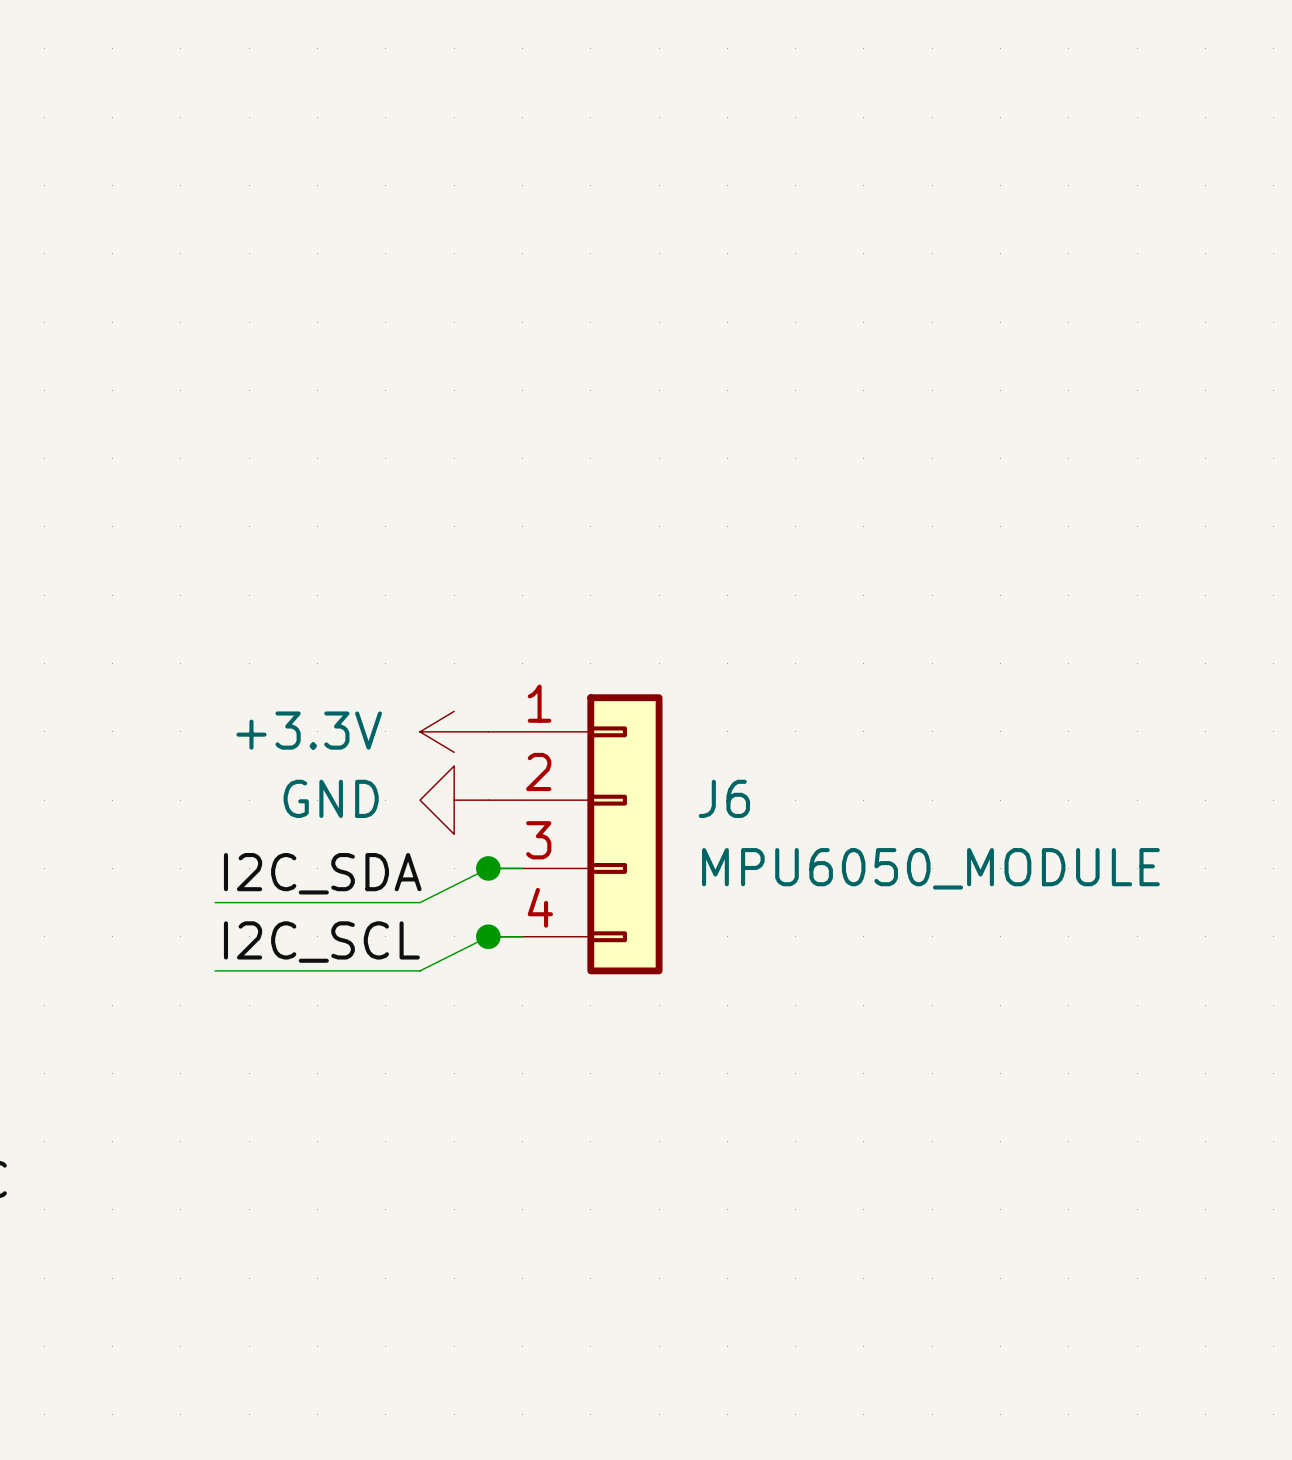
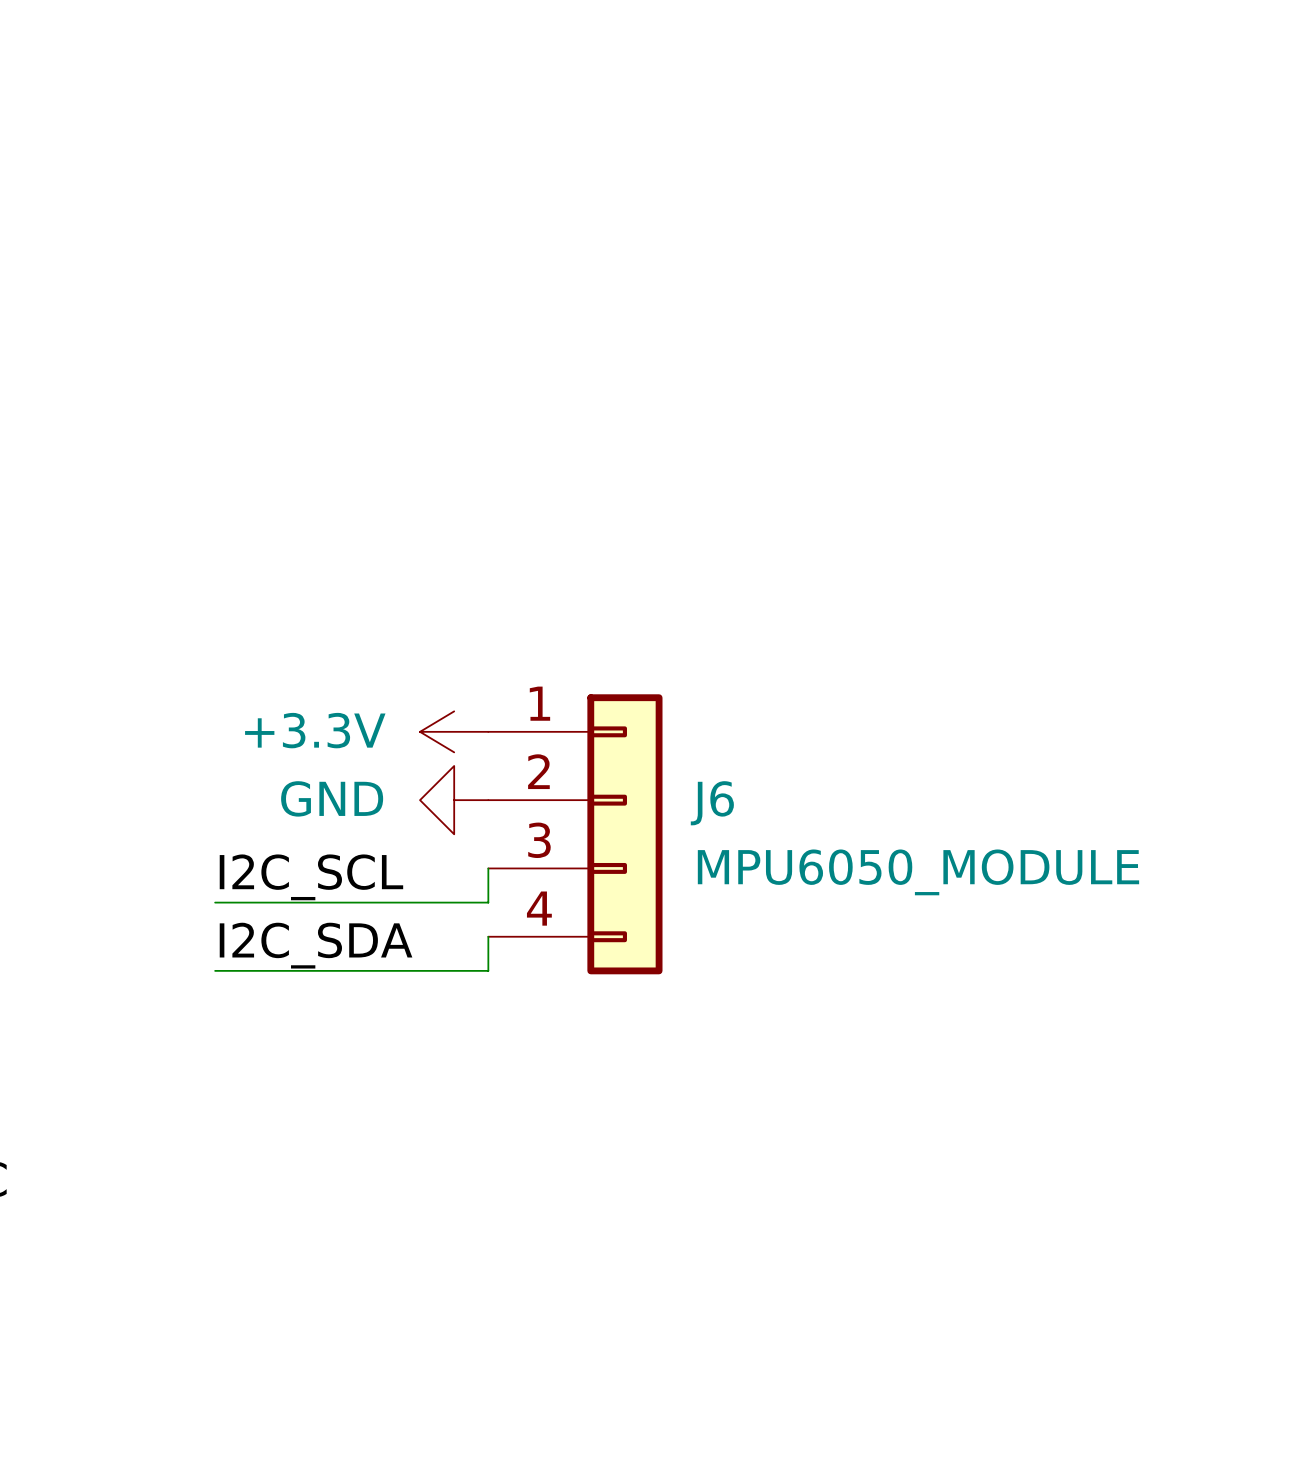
junction: (488, 868) -> none
wire: (522, 868) (488, 868) (420, 902) -> (488, 868) (488, 902) (420, 902)
label: I2C_SDA (322, 873) -> I2C_SCL (311, 877)
junction: (488, 936) -> none
wire: (522, 936) (488, 936) (420, 970) -> (488, 936) (488, 970) (420, 970)
label: I2C_SCL (321, 942) -> I2C_SDA (316, 945)

